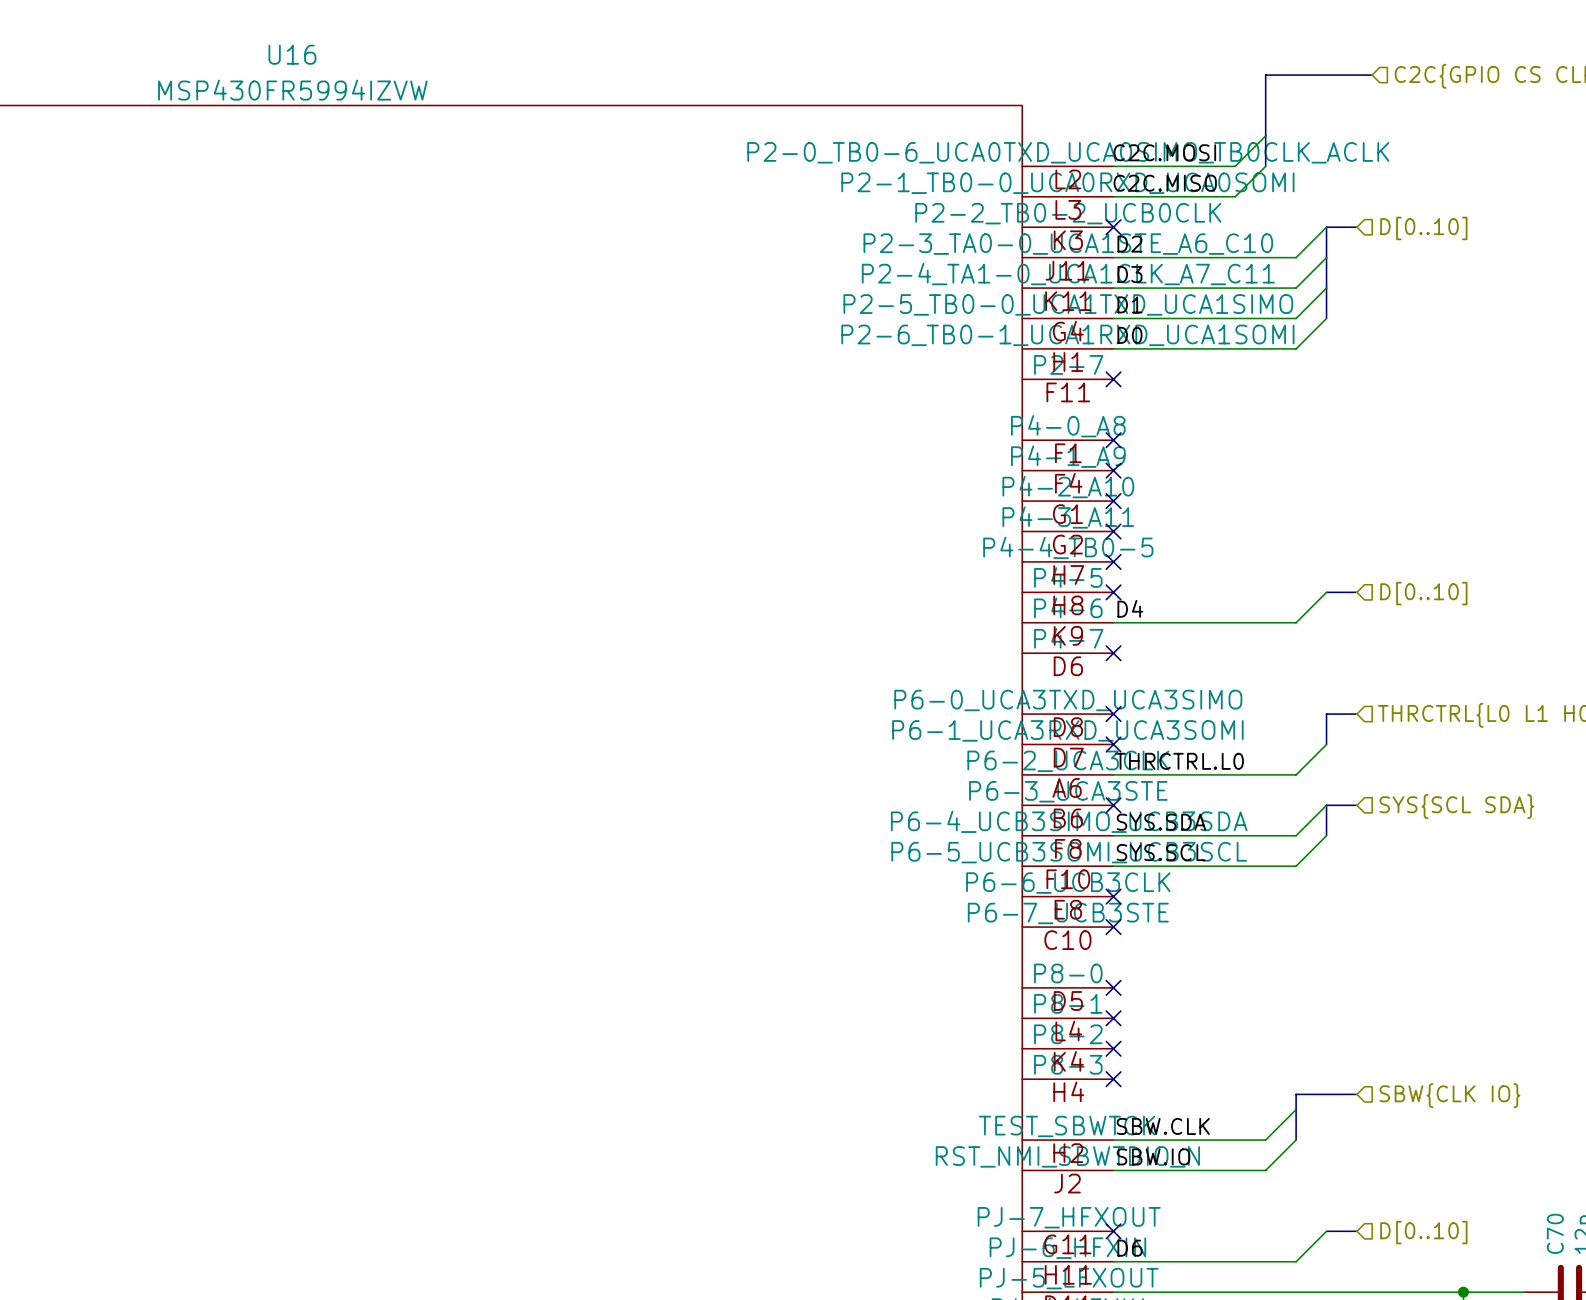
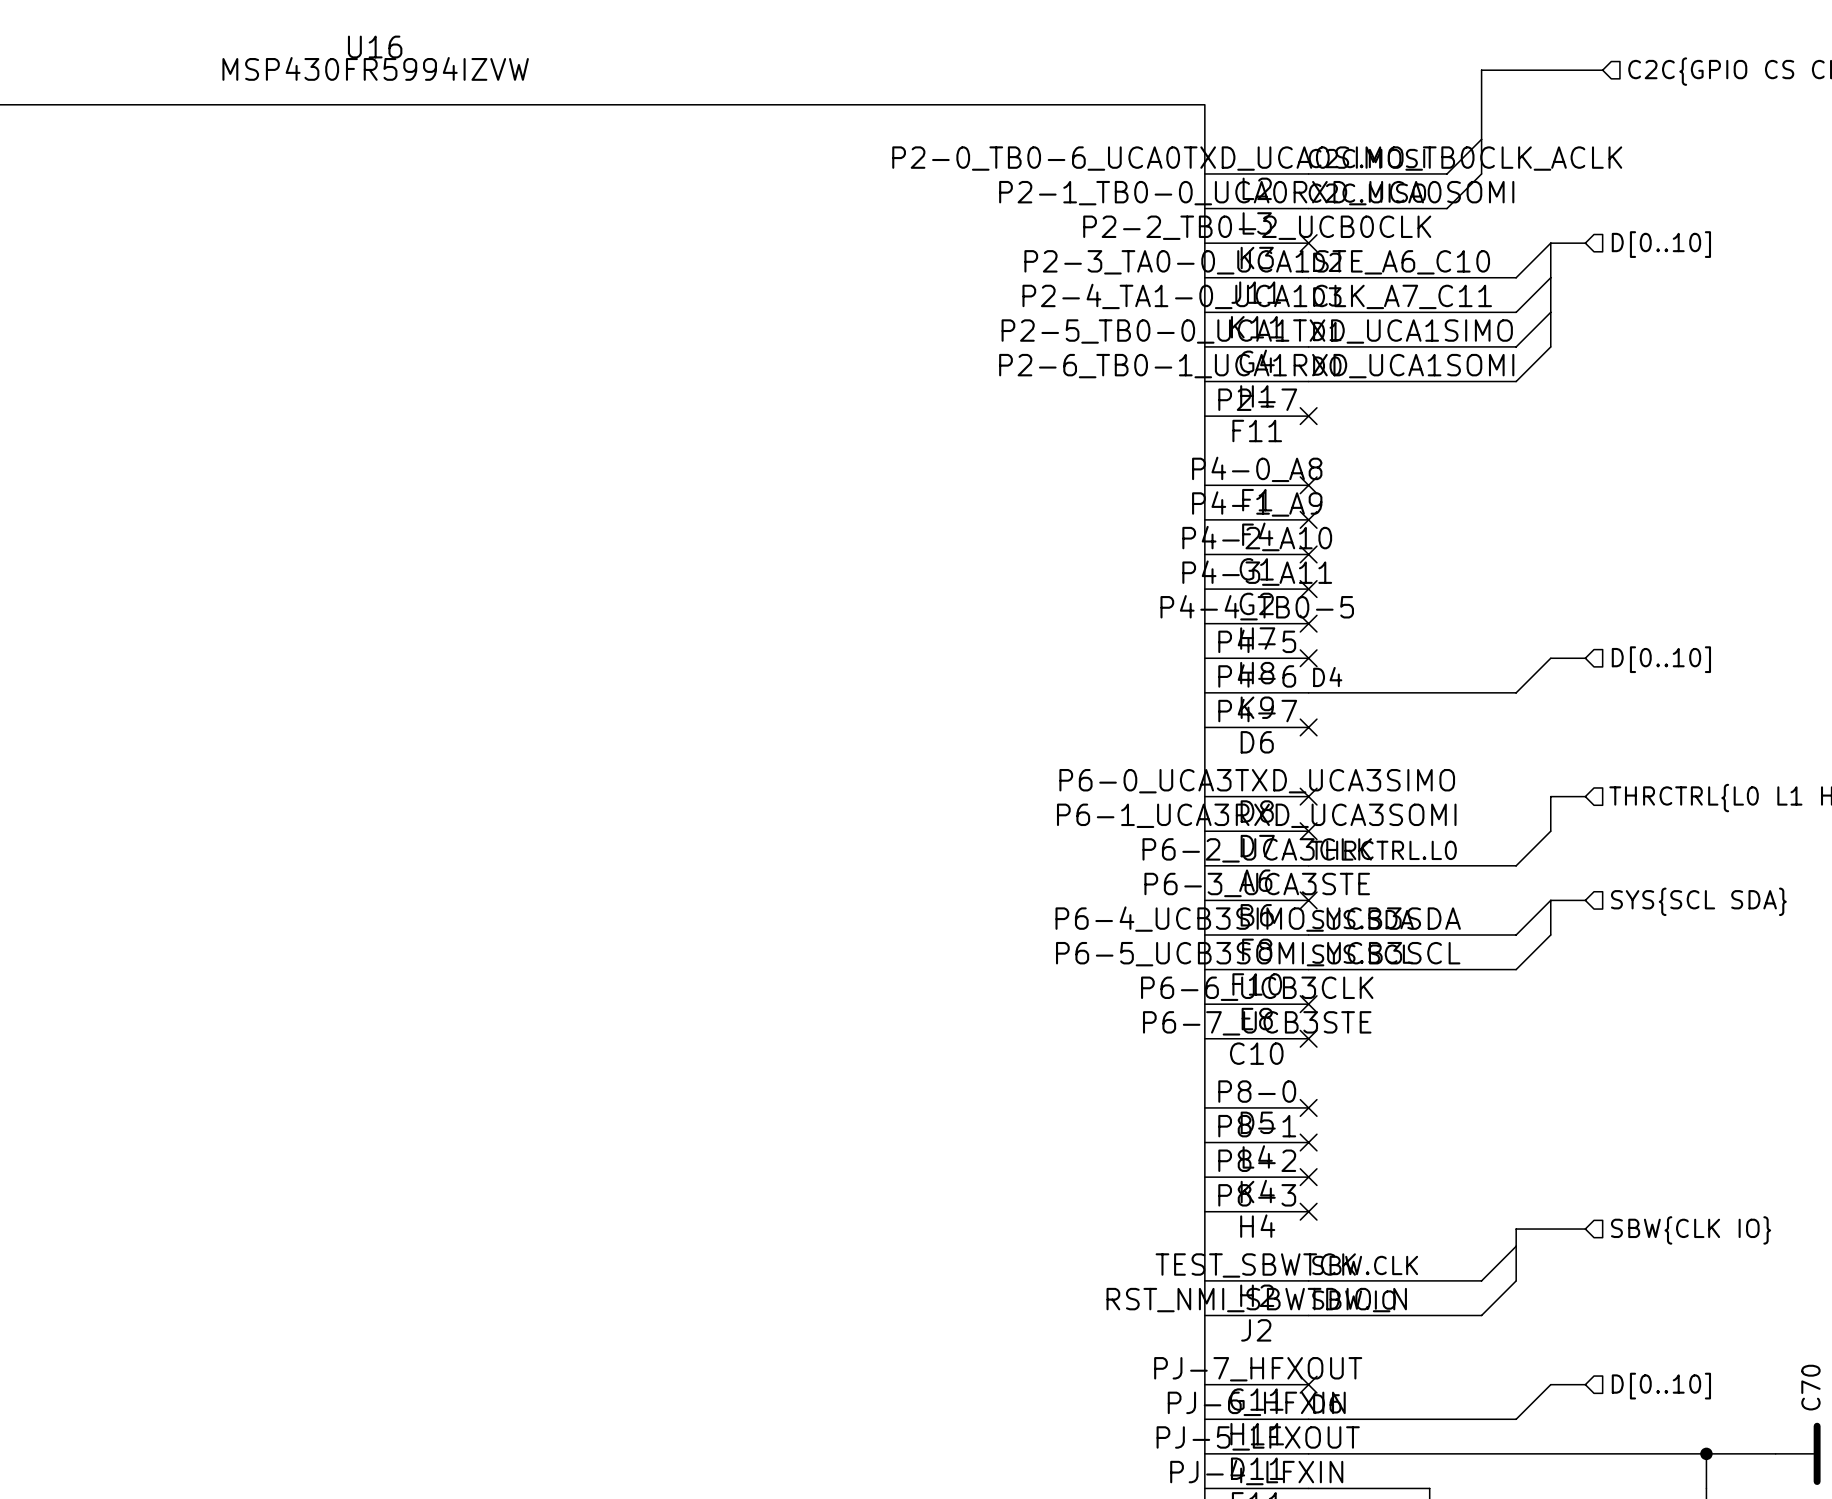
U16 value position: MSP430FR5994IZVW (292, 90) -> MSP430FR5994IZVW (375, 68)

